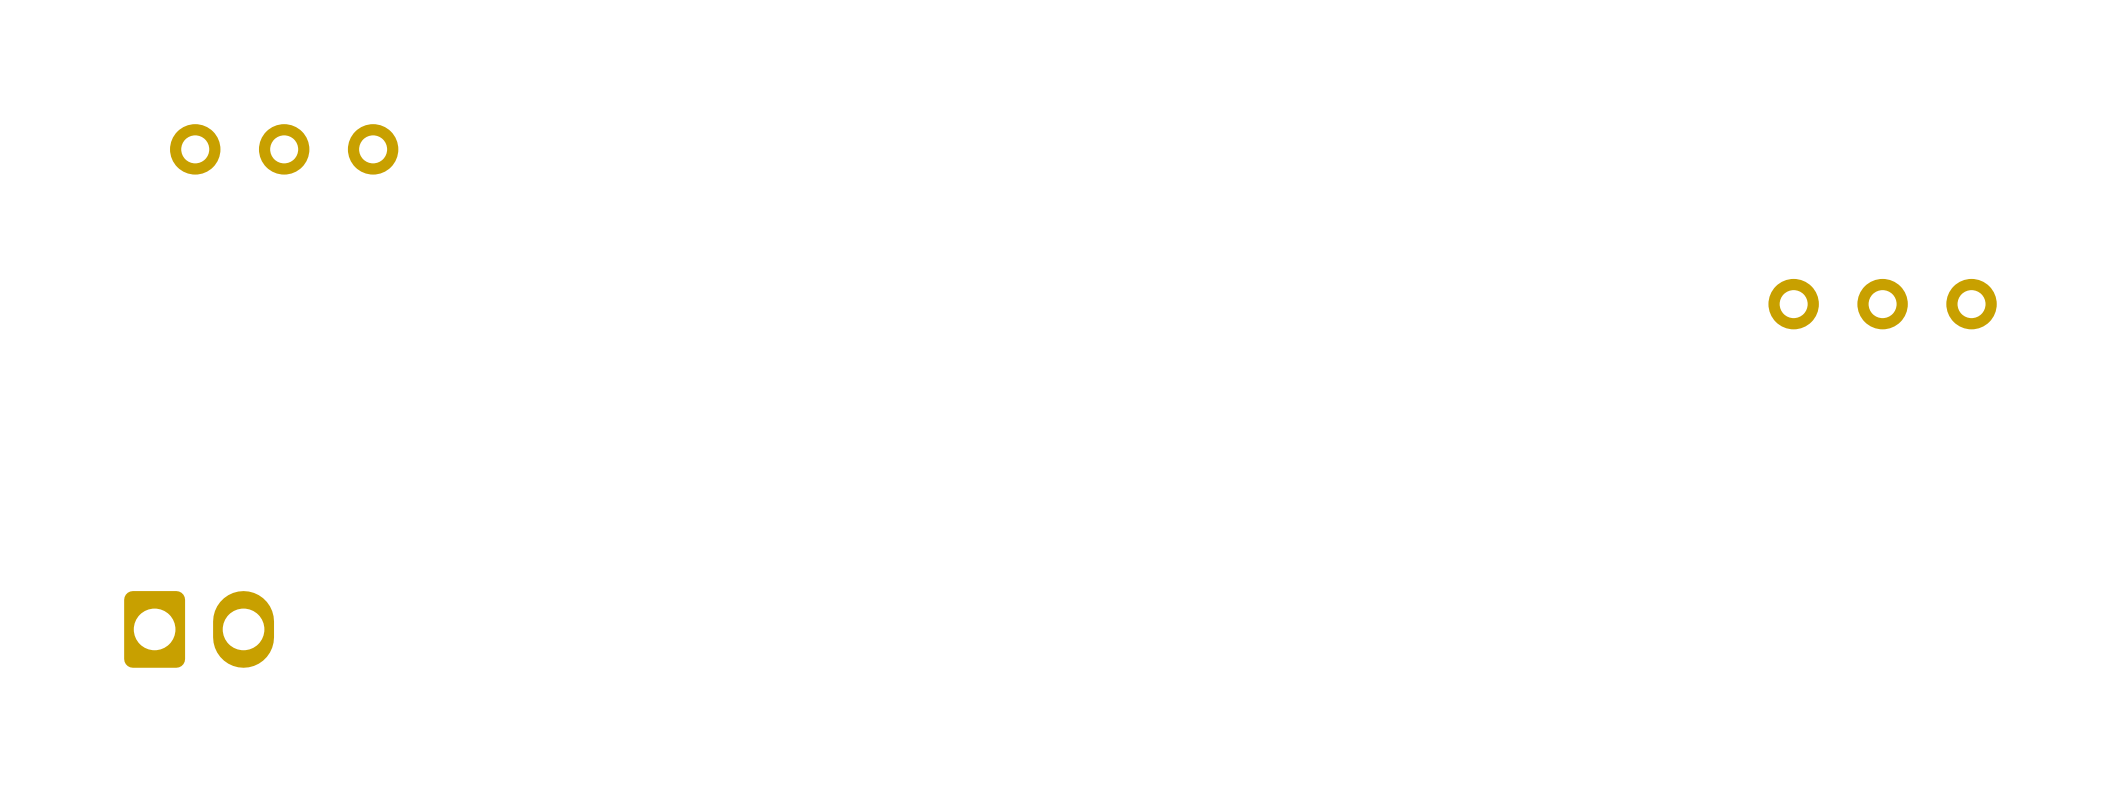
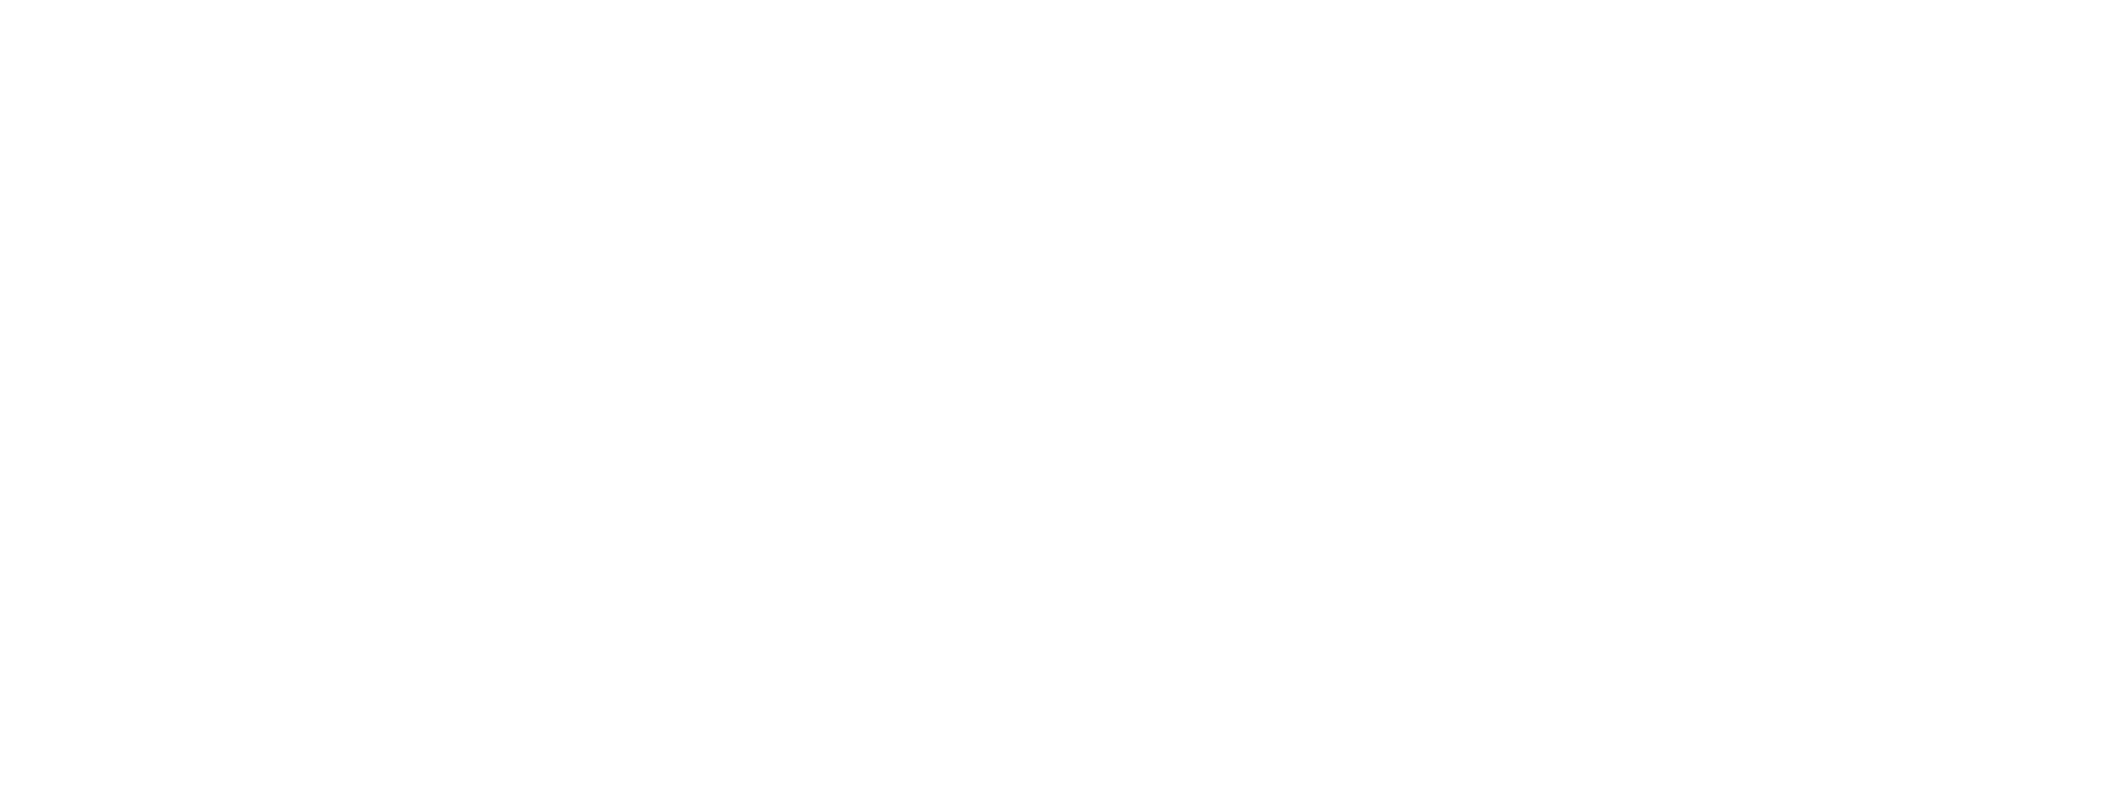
part: (284, 149) -> none
part: (1882, 304) -> none
part: (199, 629) -> none

